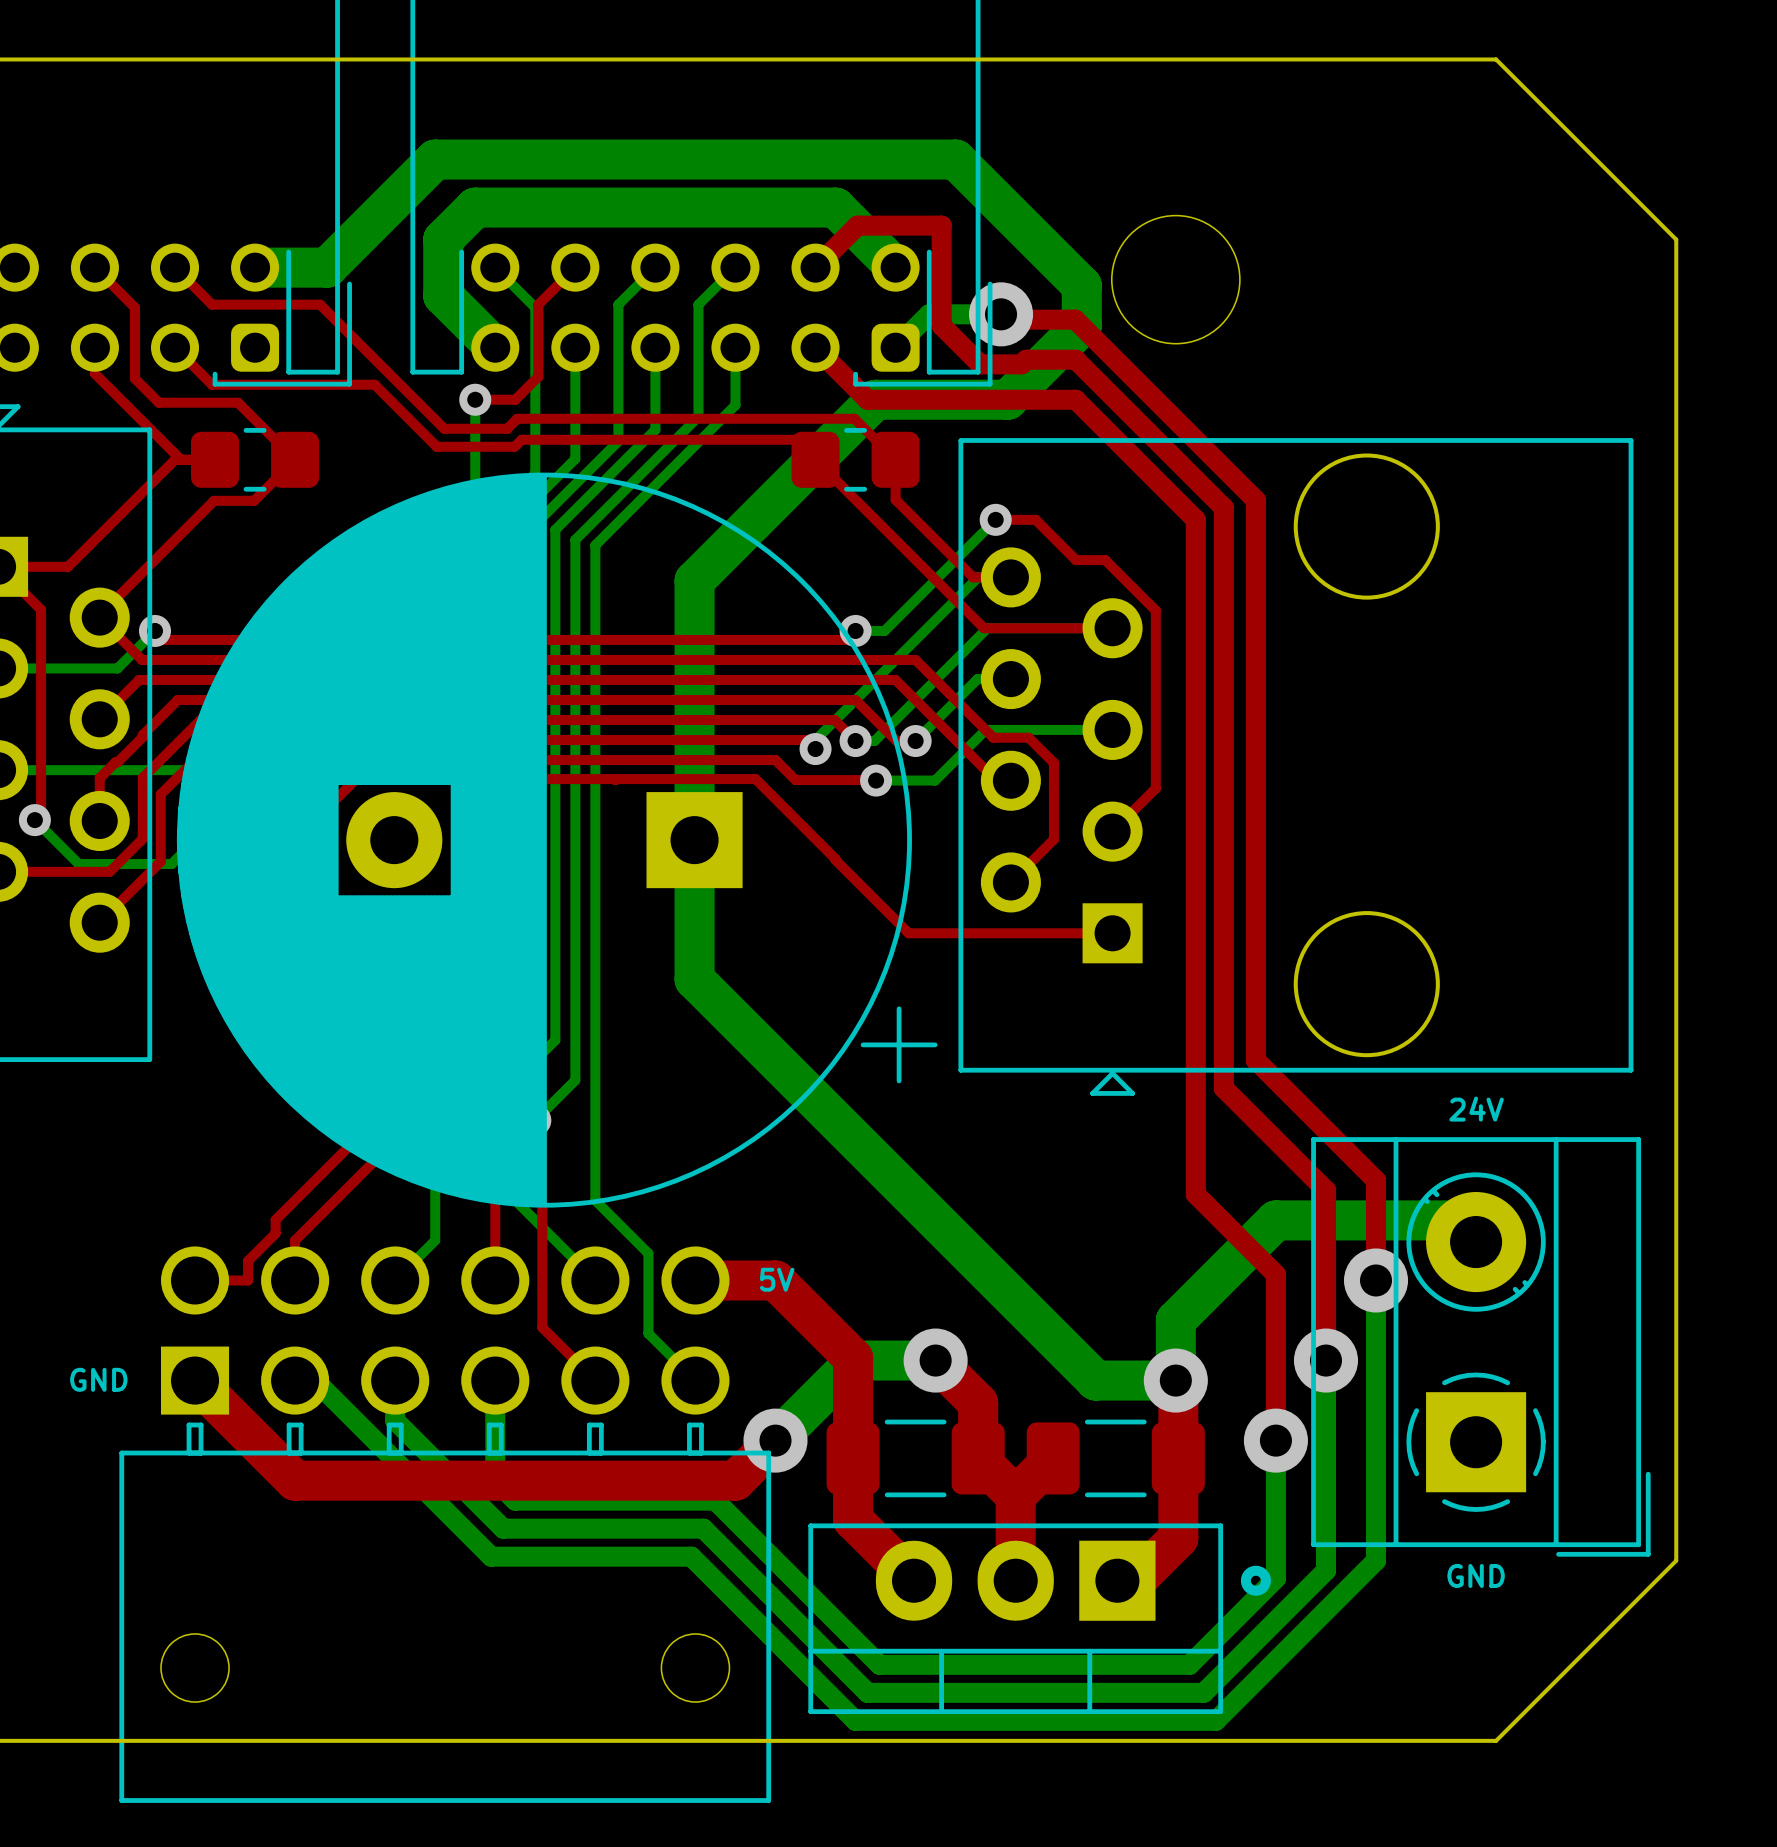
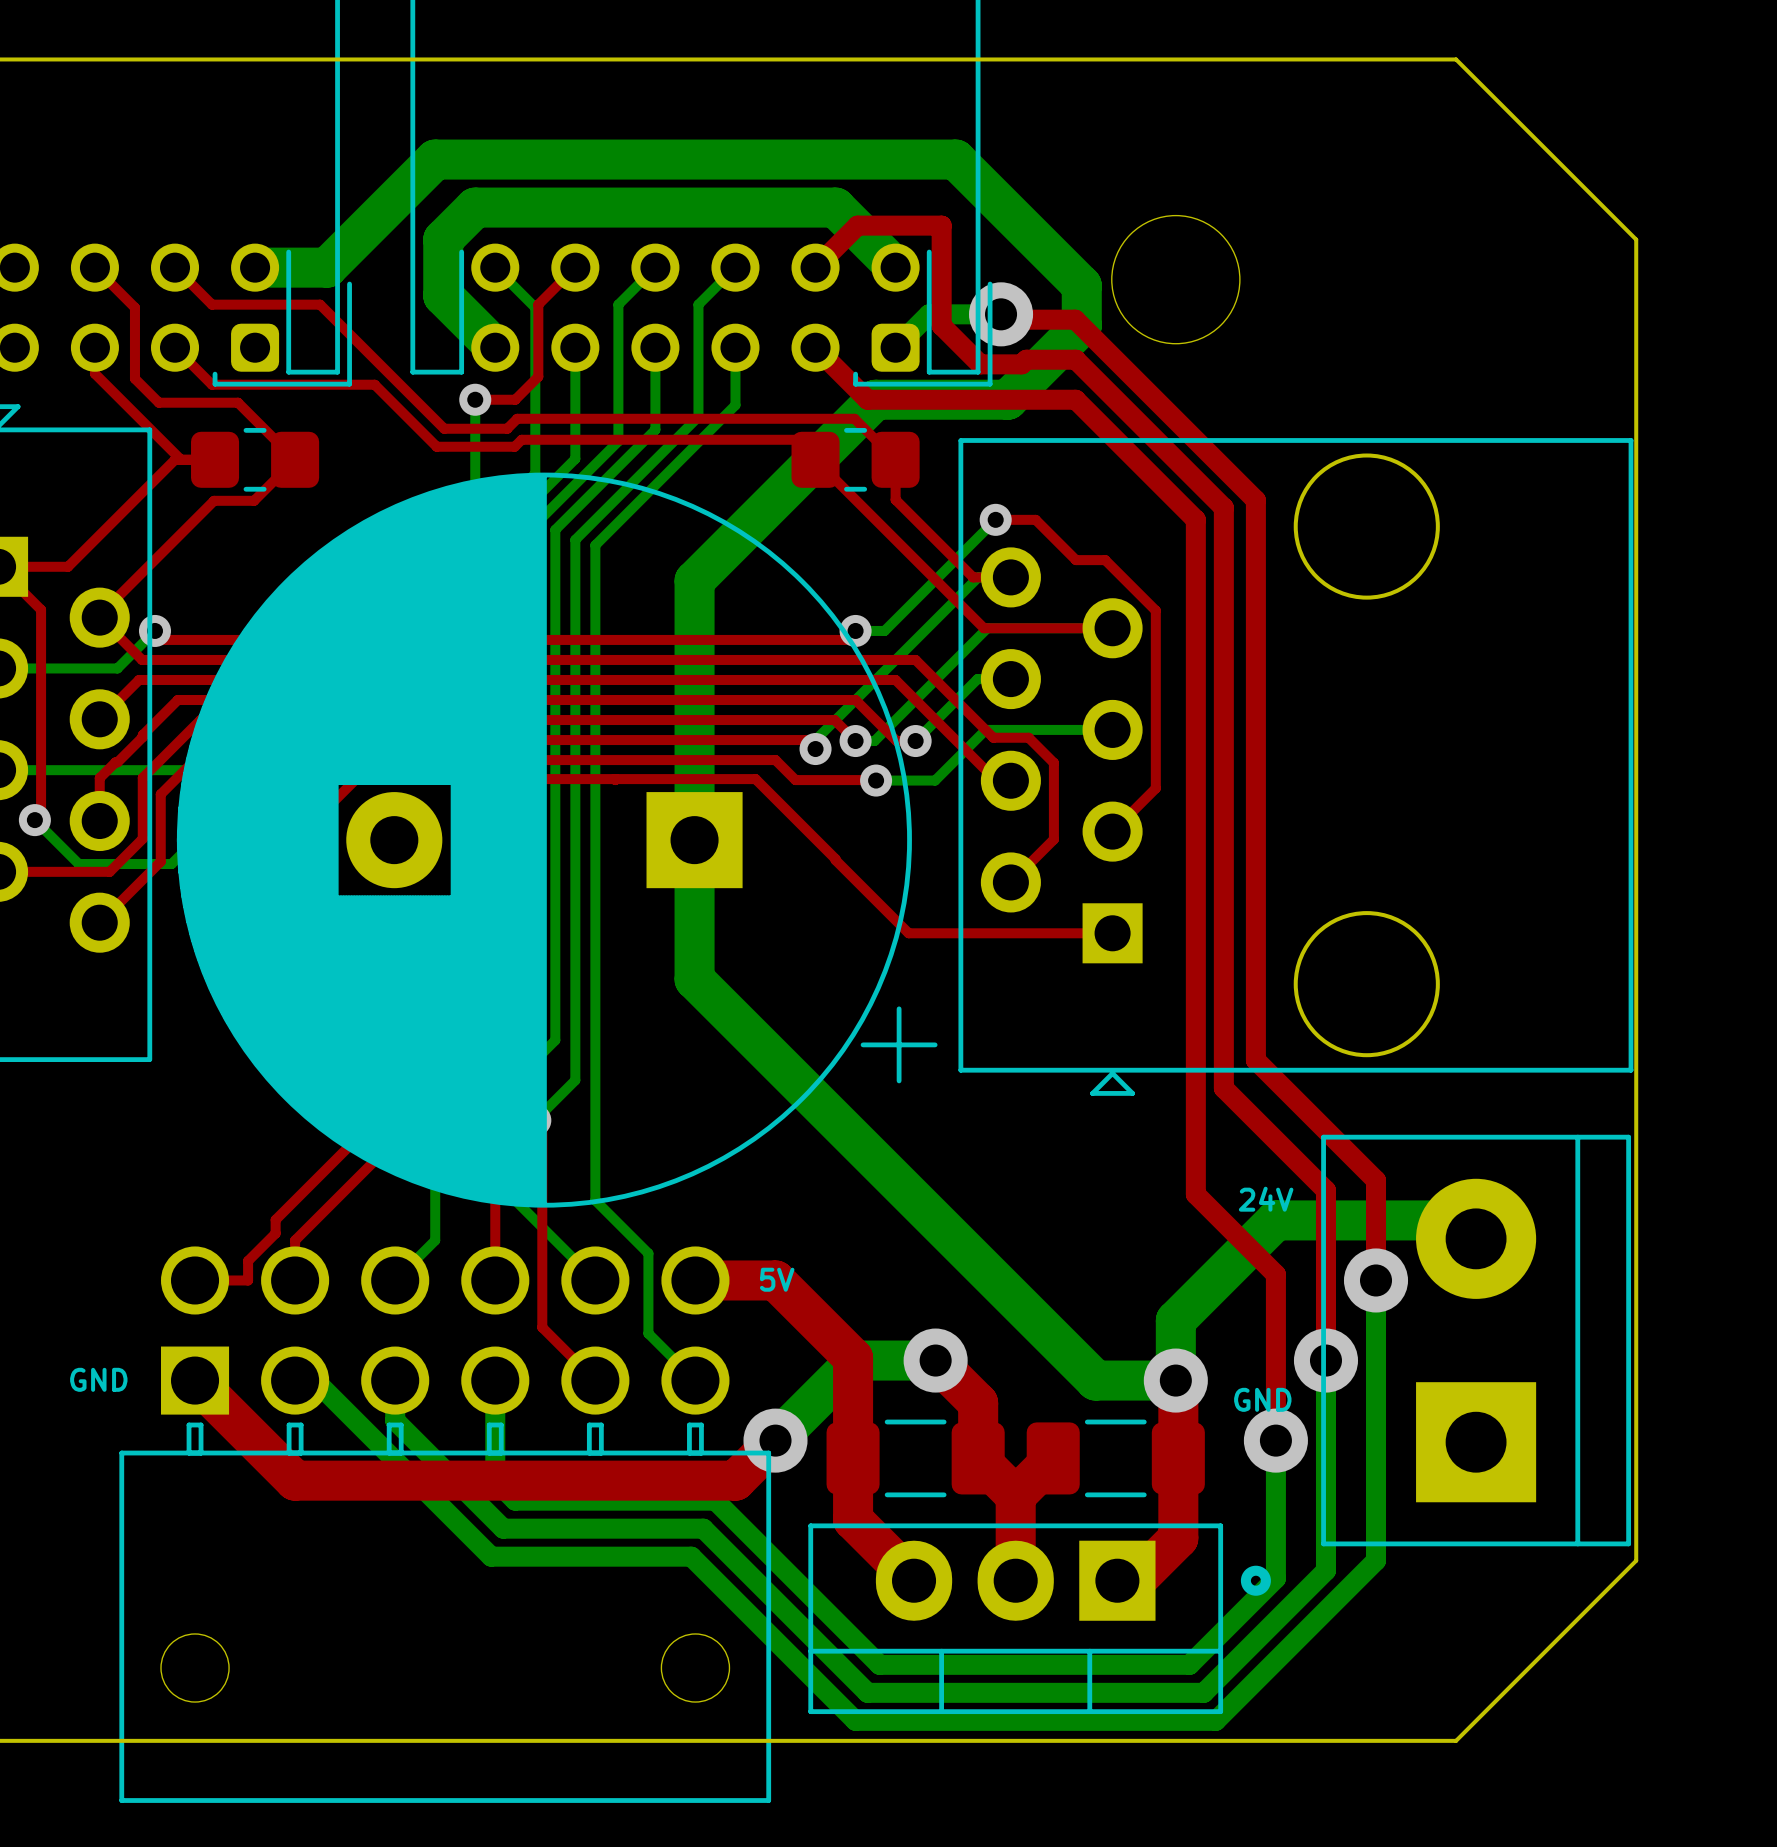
board edge: (1456, 59) (1496, 59) (1676, 239) (1676, 1560) (1496, 1740) (1456, 1740) -> (1456, 59) (1636, 239) (1636, 1560) (1456, 1740)
text position: 24V (1476, 1109) -> 24V (1266, 1199)
part footprint: [1311, 1137, 1651, 1557] -> [1321, 1134, 1632, 1547]
text position: GND (1476, 1575) -> GND (1262, 1399)

